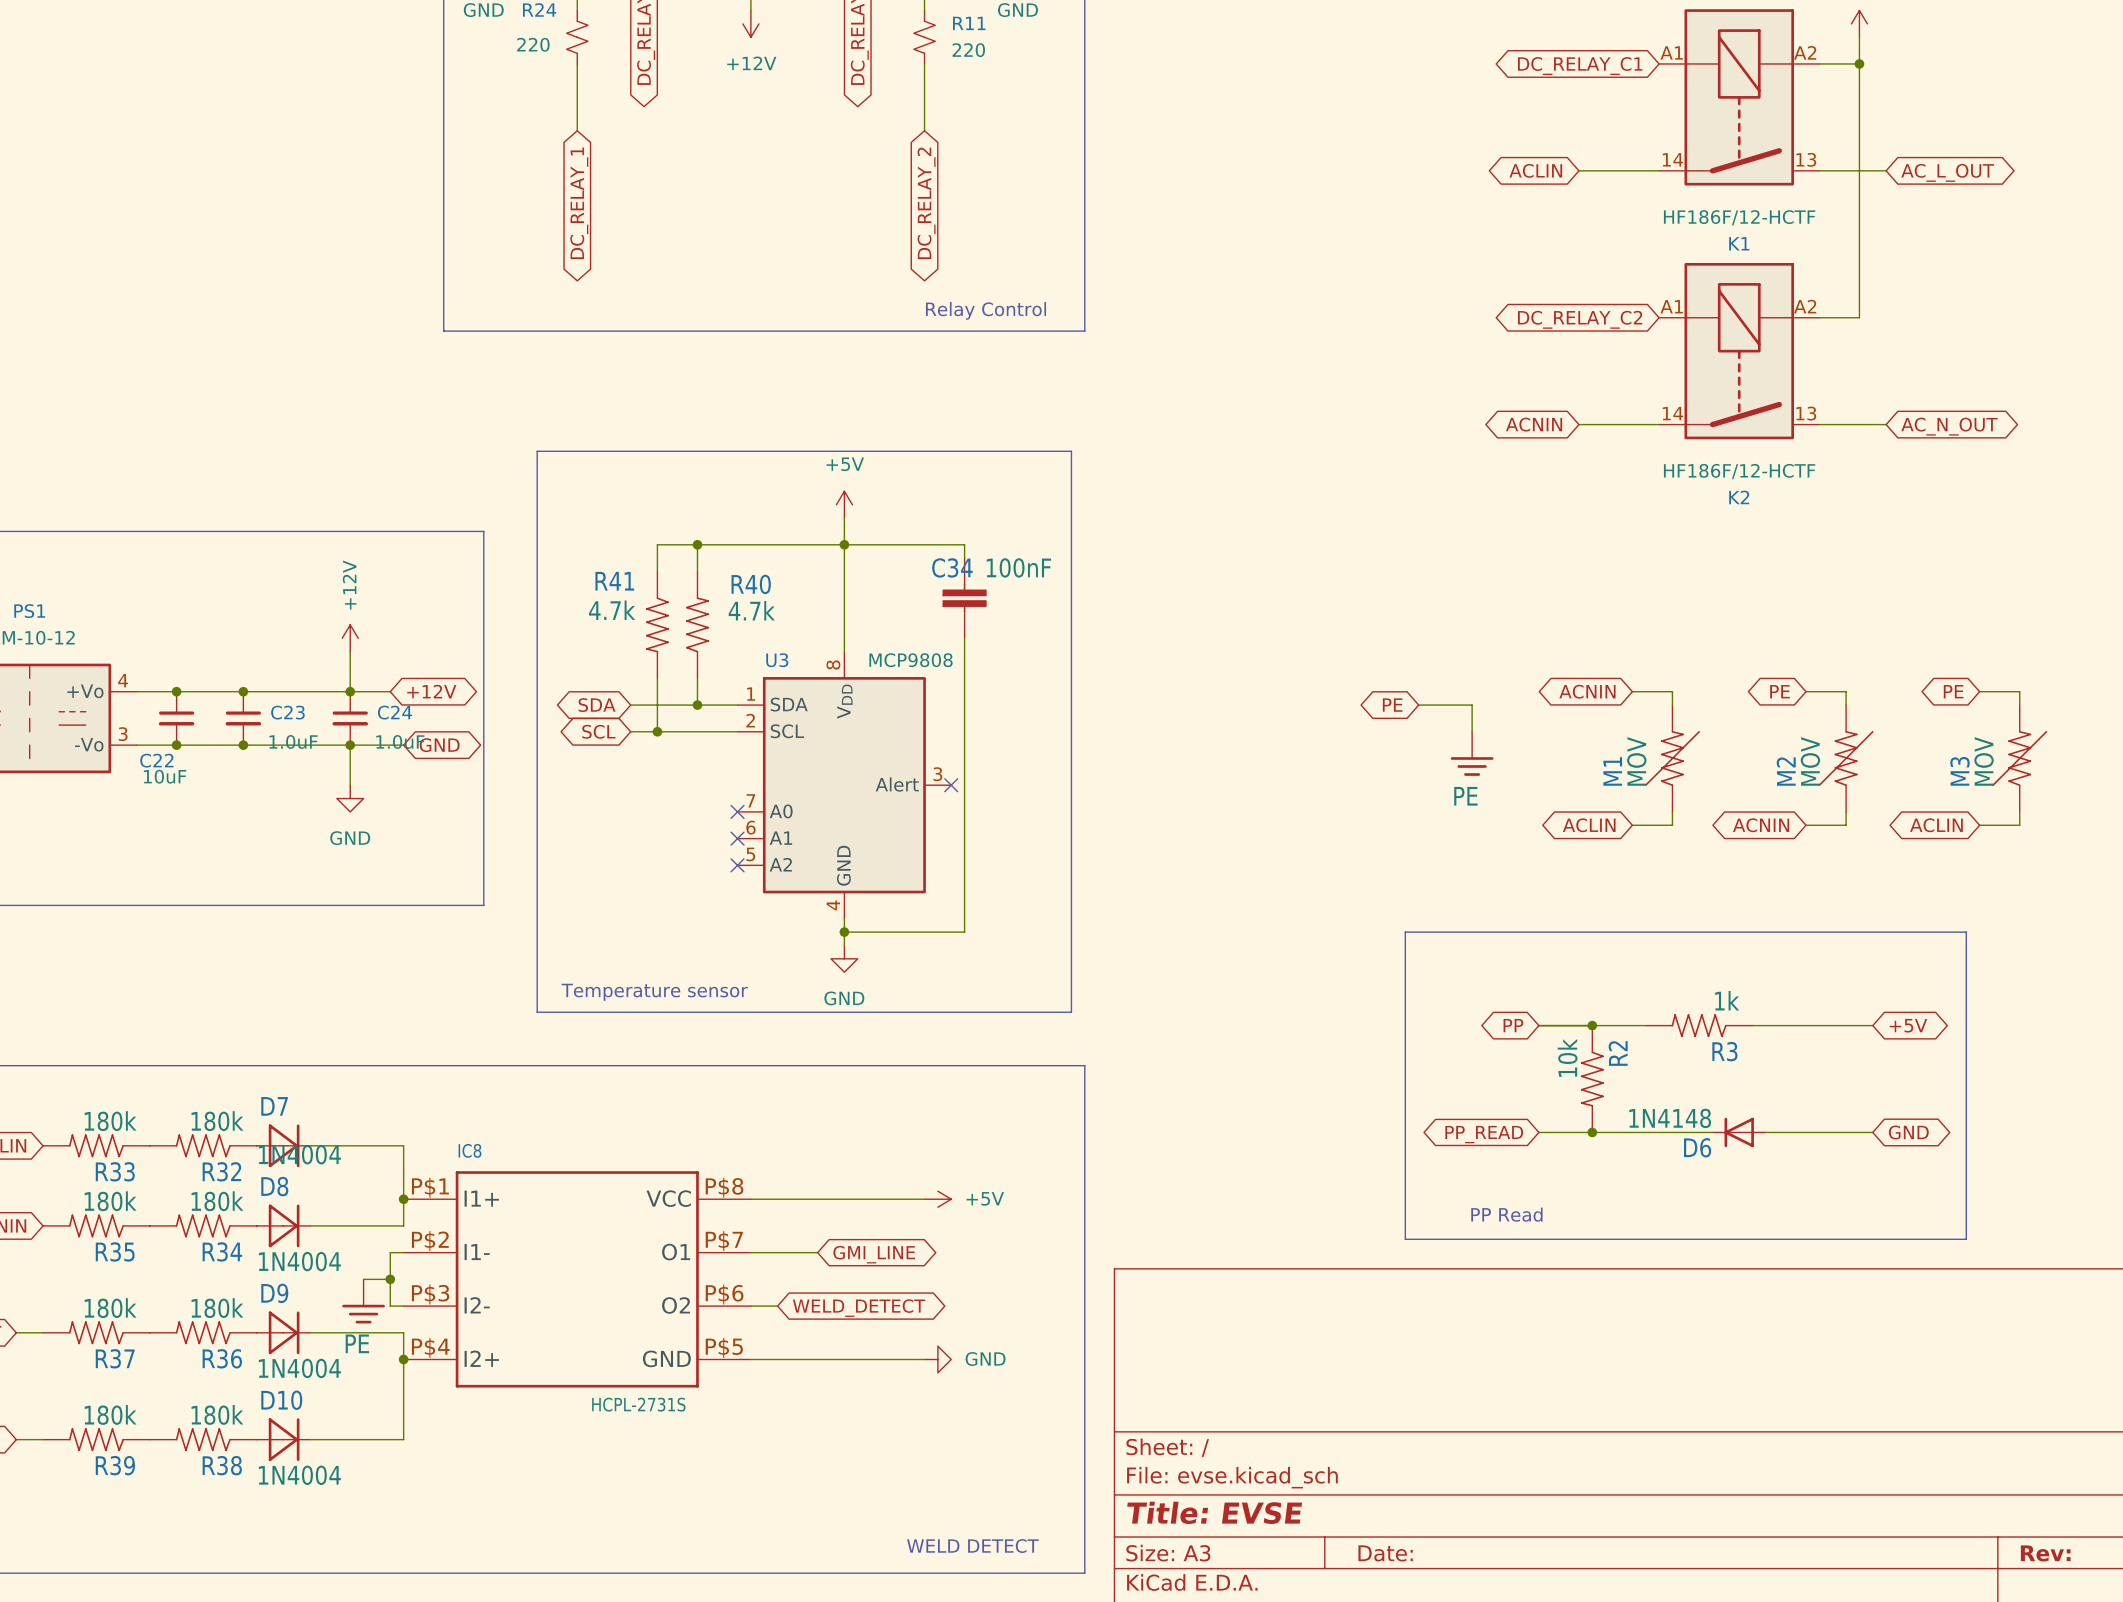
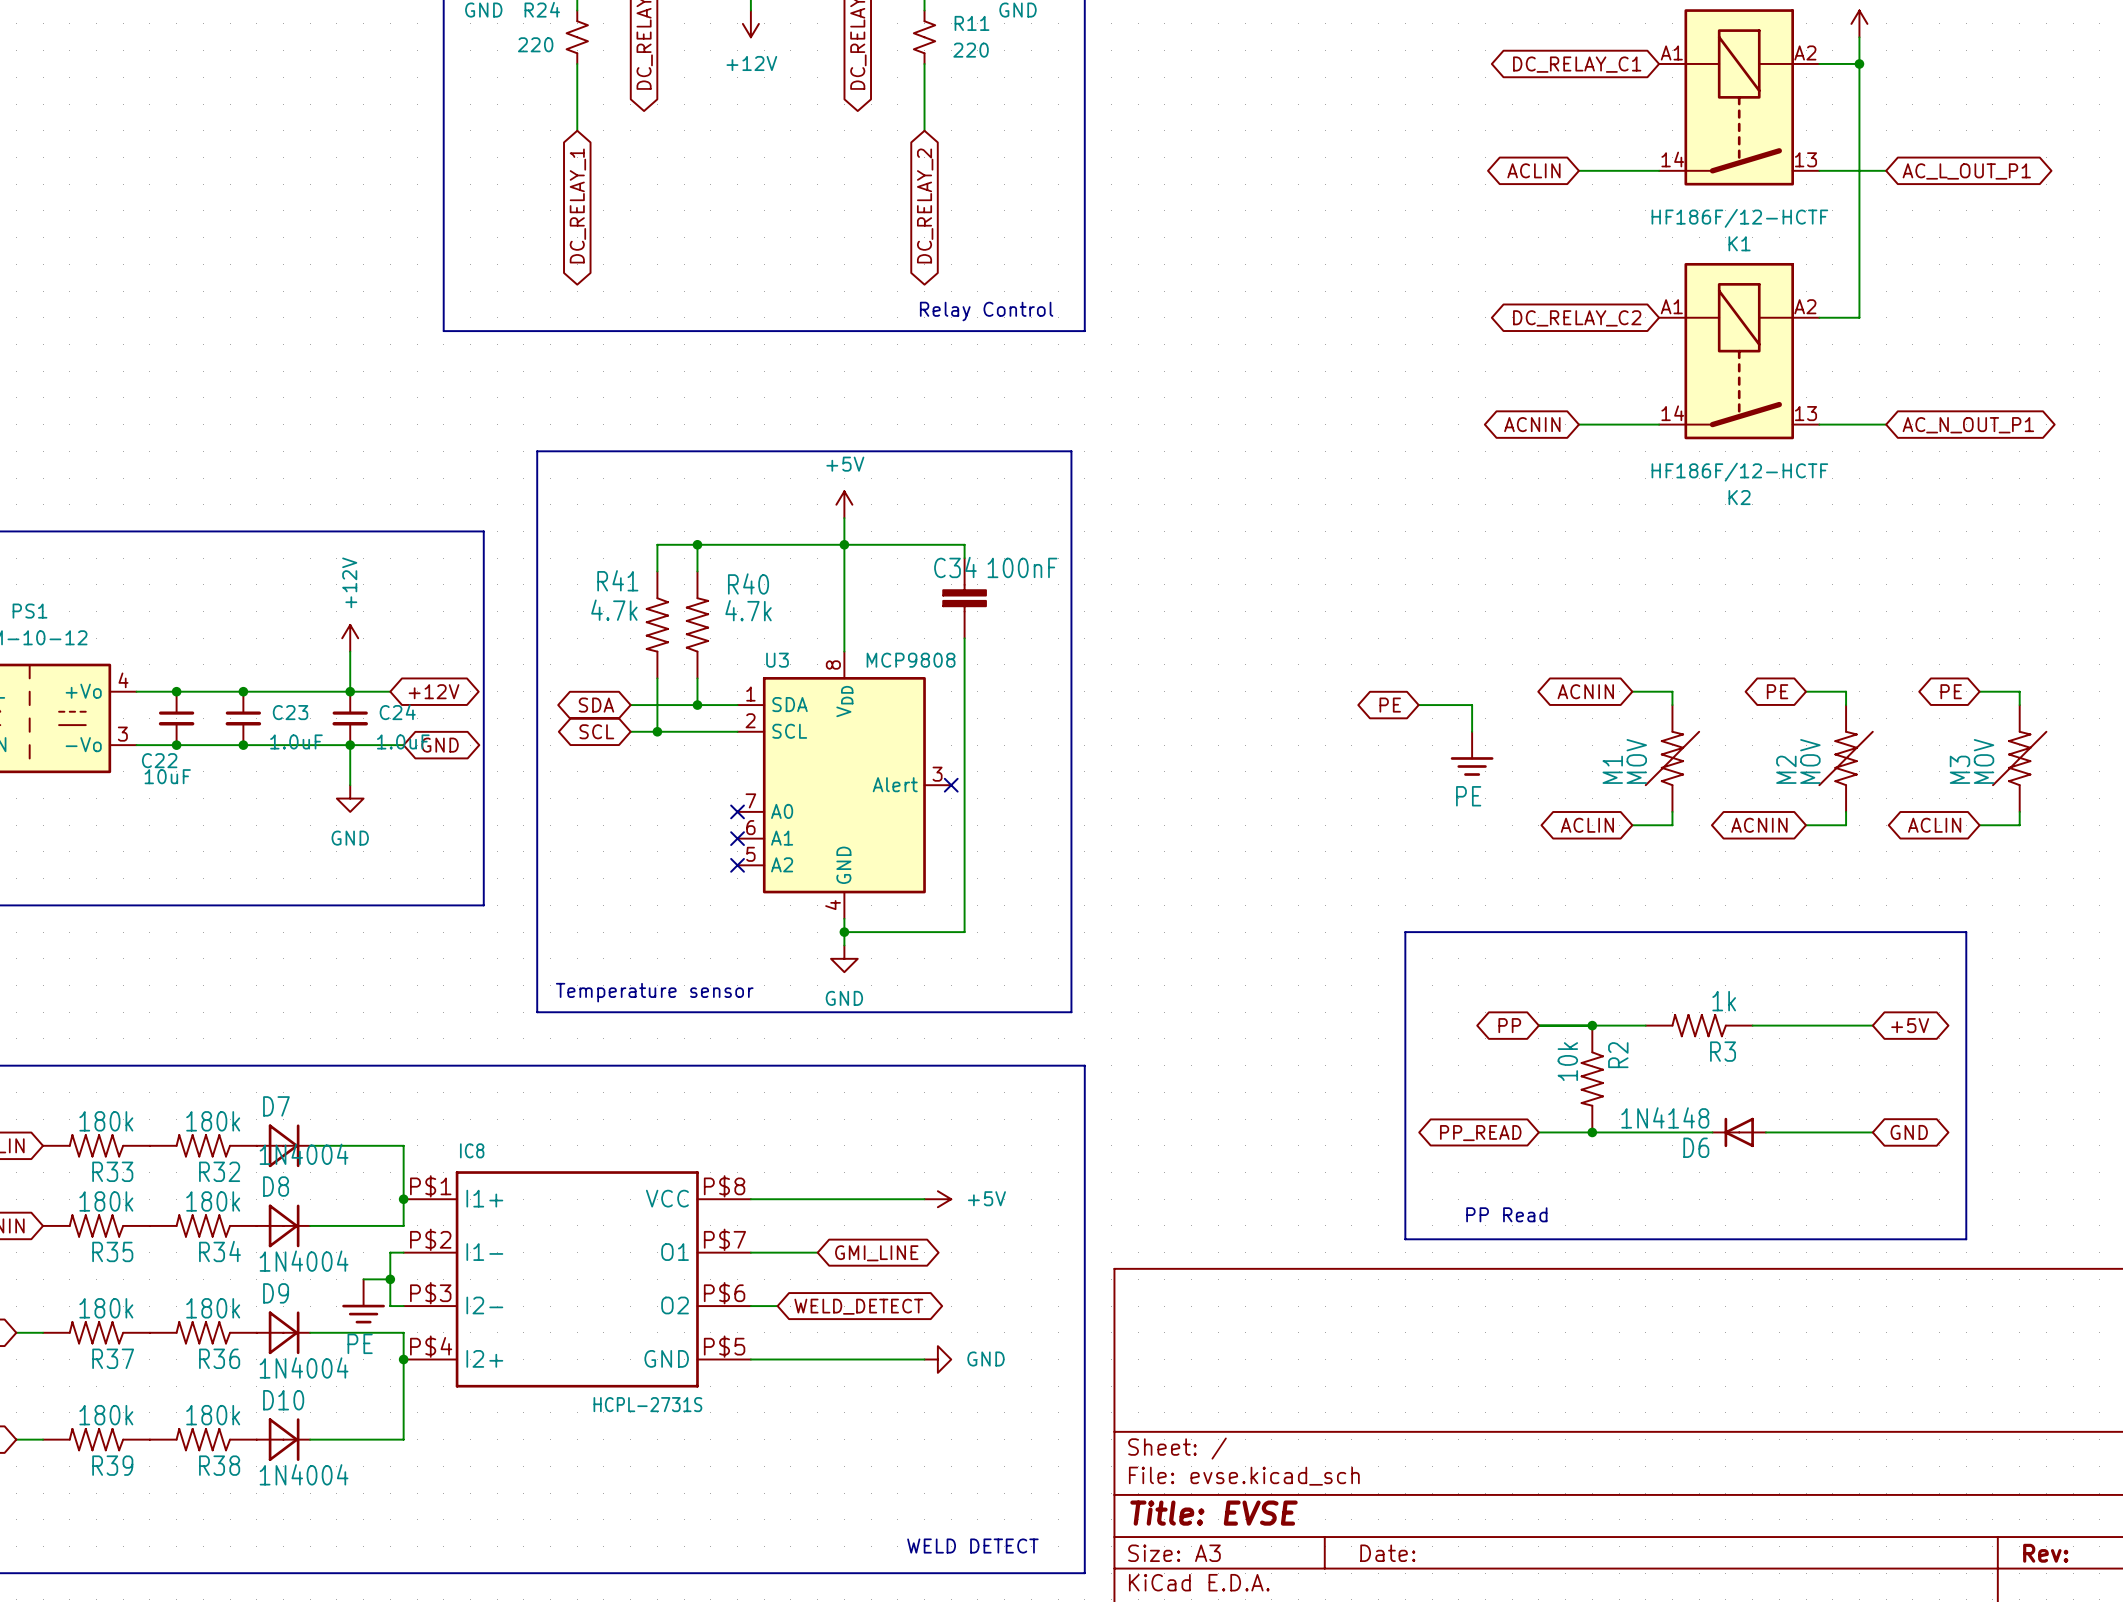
global label: AC_L_OUT (1947, 172) -> AC_L_OUT_P1 (1966, 171)
global label: AC_N_OUT (1949, 426) -> AC_N_OUT_P1 (1968, 425)

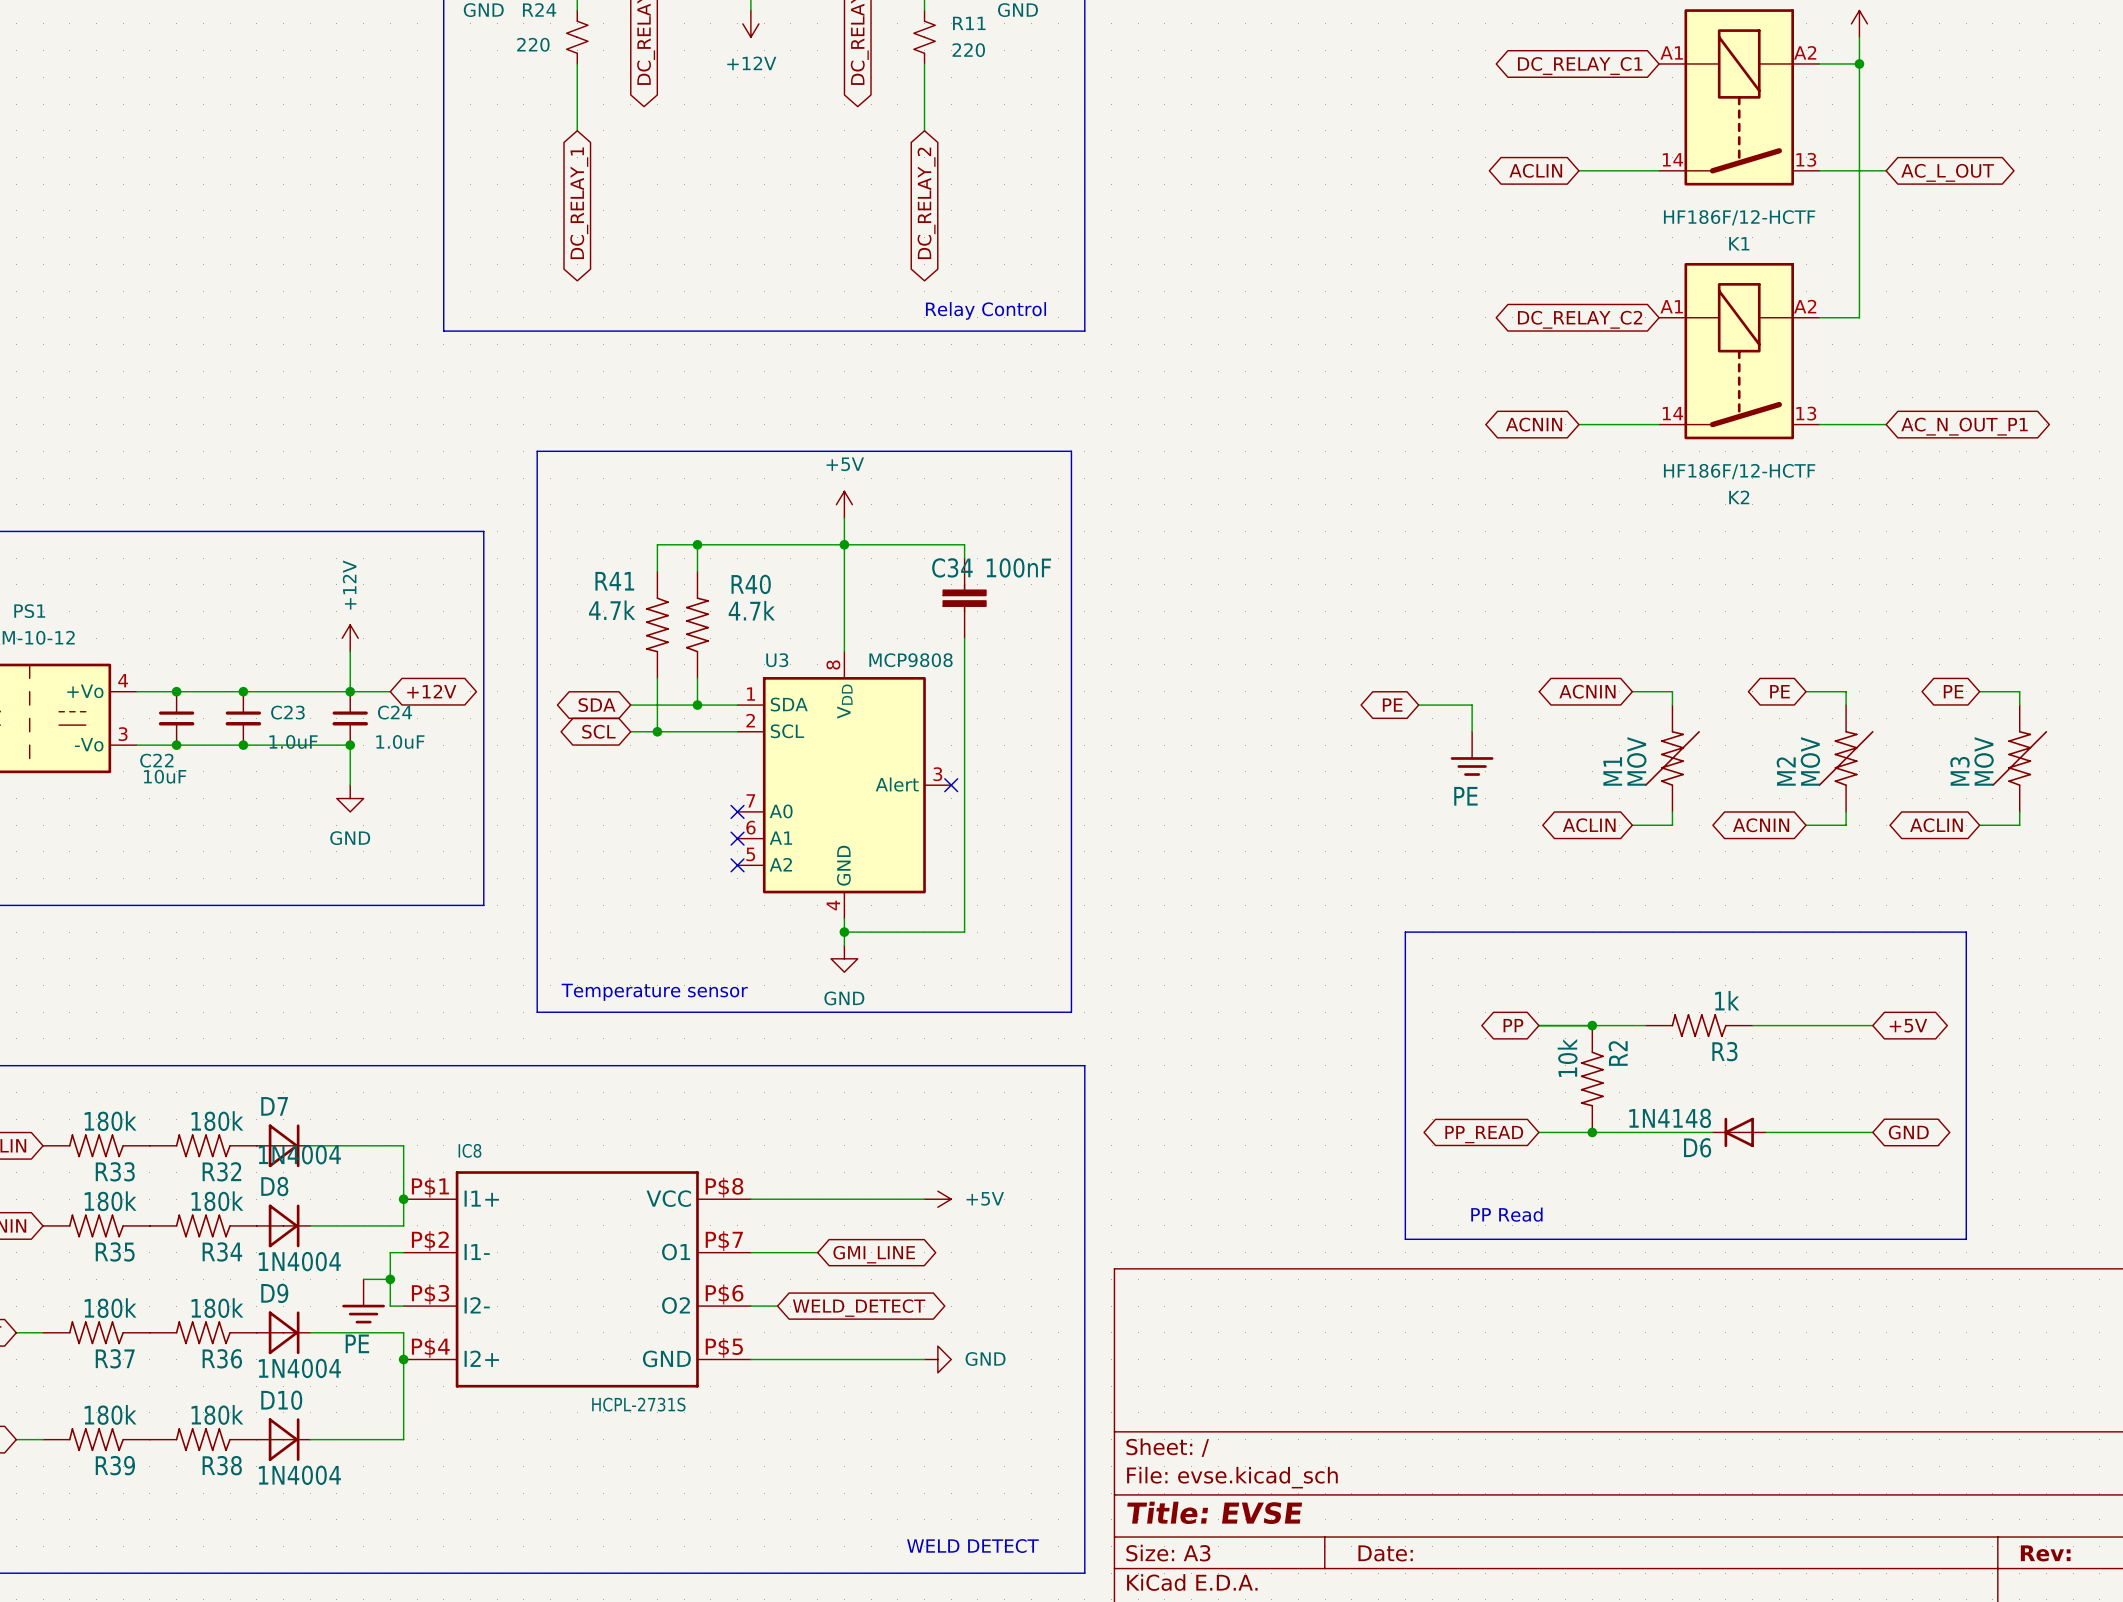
global label: AC_L_OUT_P1 (1966, 171) -> AC_L_OUT (1947, 172)
wire: (350, 745) (403, 745) -> none
global label: GND (440, 745) -> none

